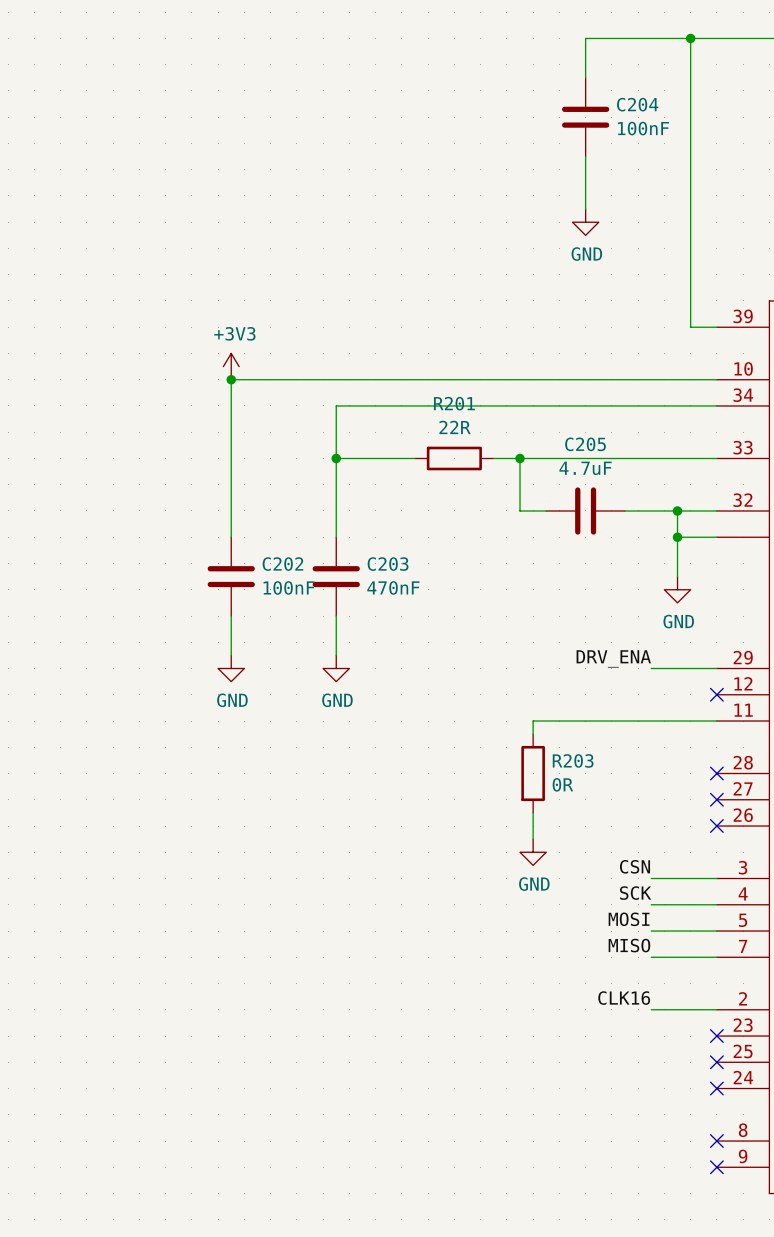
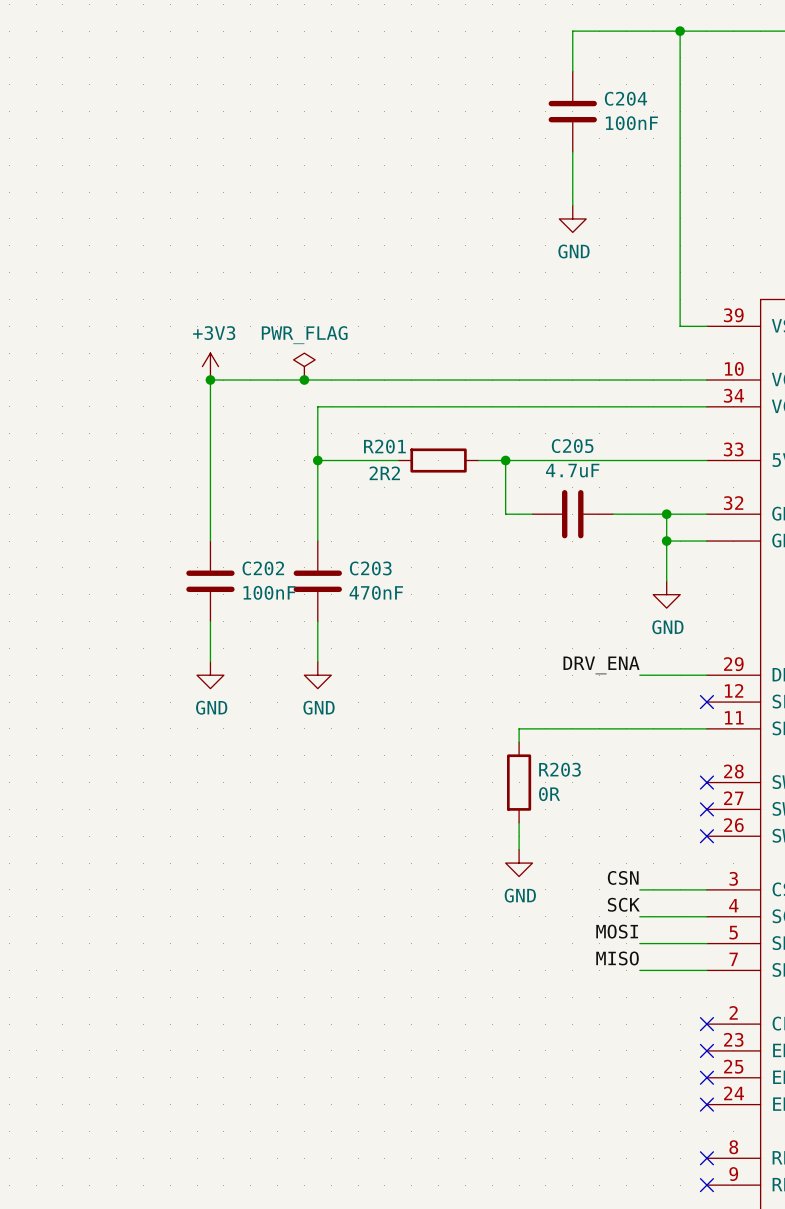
power symbol: none -> PWR_FLAG (304, 366)
junction: none -> (304, 380)
R201 name position: R201 (454, 403) -> R201 (384, 446)
R201 value: 22R (455, 427) -> 2R2 (384, 473)
label: CLK16 (624, 998) -> none
wire: (651, 1009) (716, 1009) -> none
no-connect mark: none -> (706, 1024)

